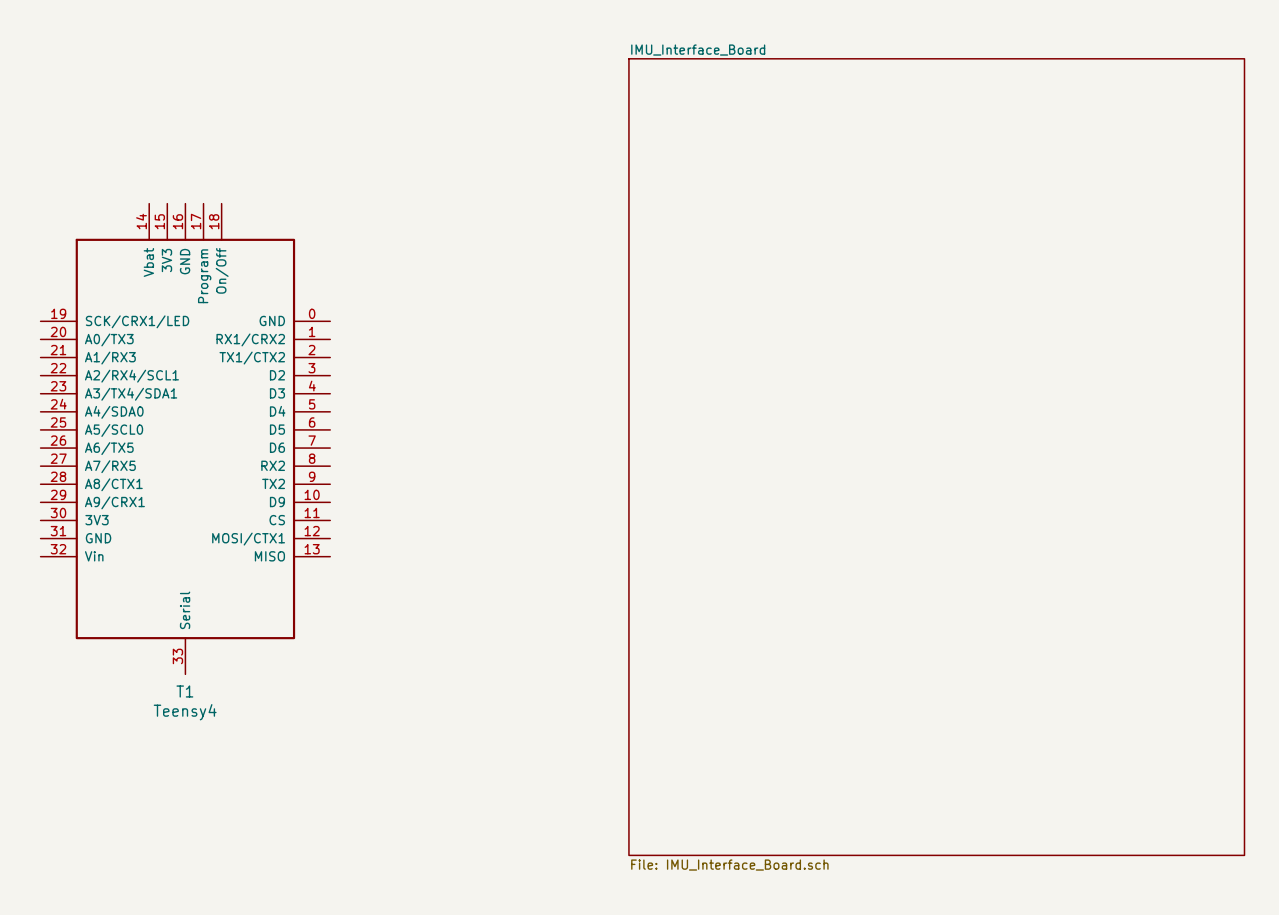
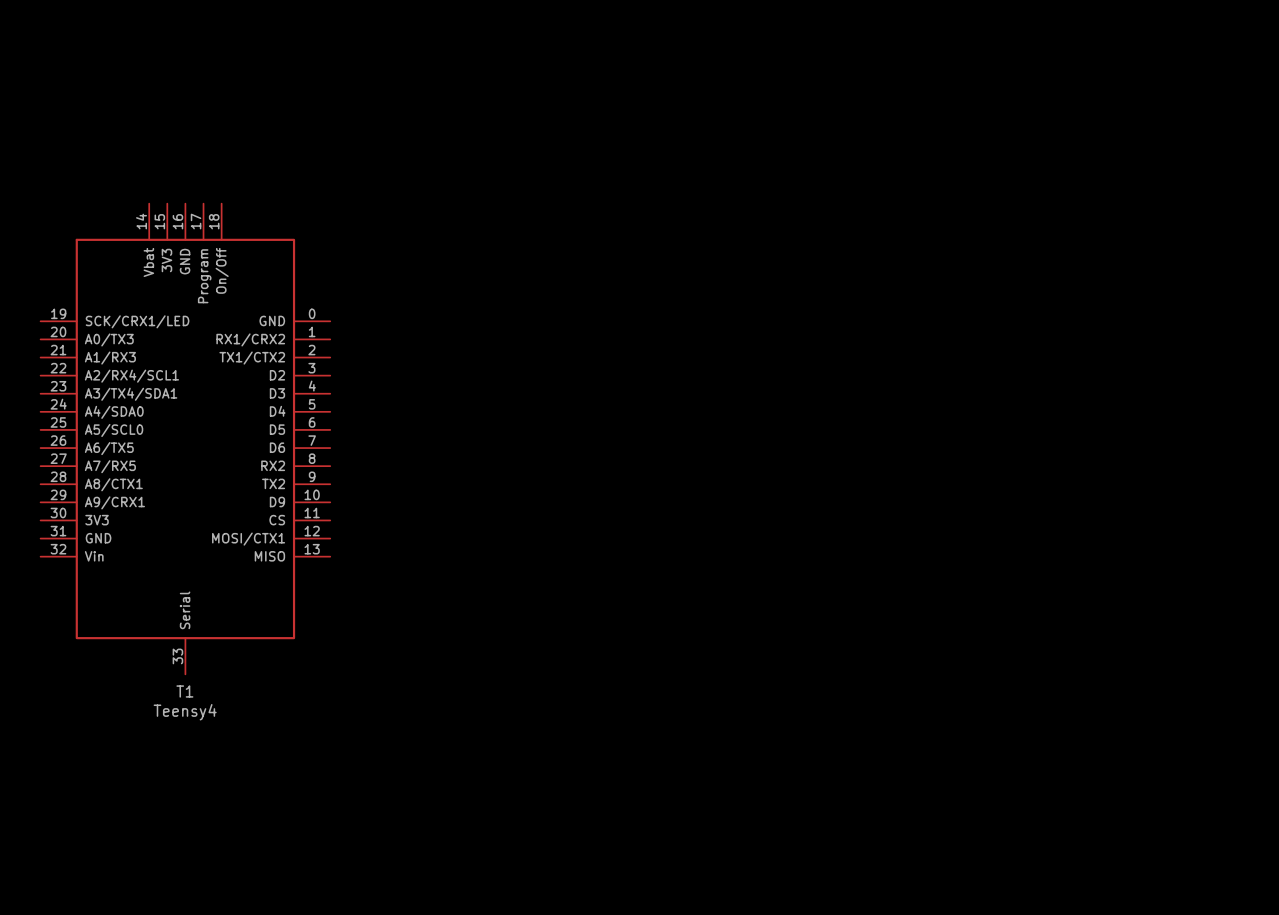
sheet IMU_Interface_Board: File: IMU_Interface_Board.sch (936, 457) -> none

